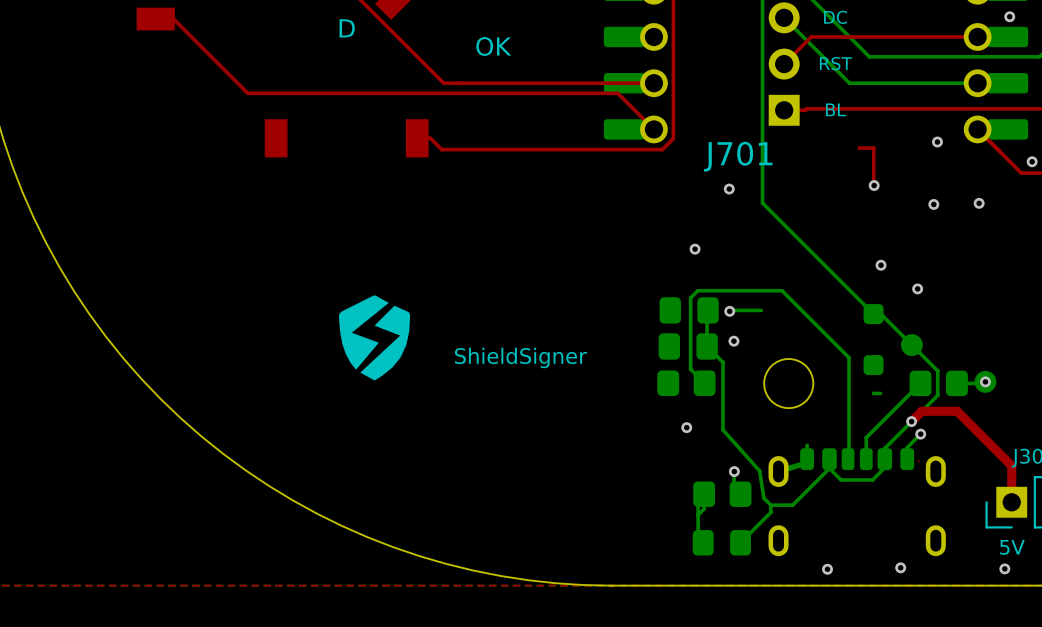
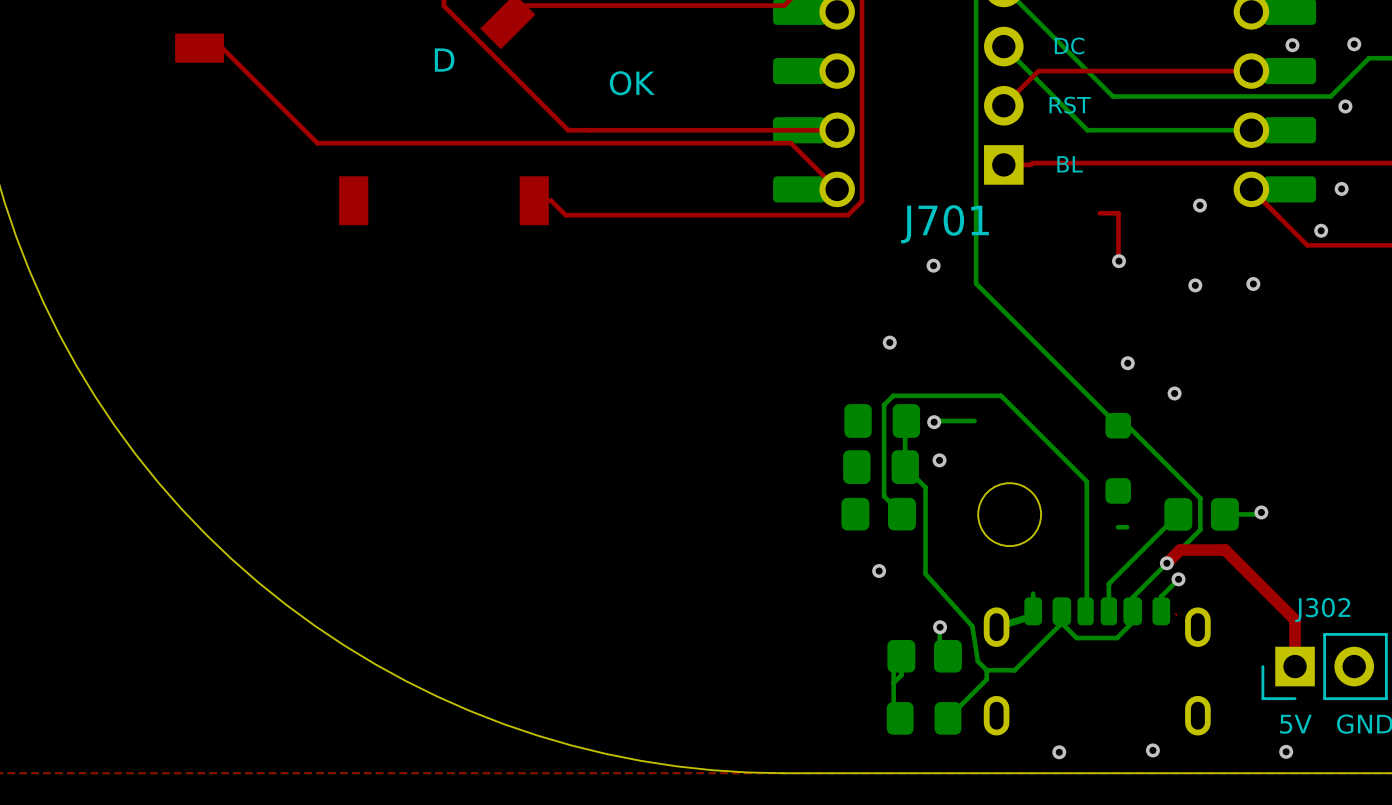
drawing: [339, 295, 411, 381] -> none
part: (911, 345) -> none
text: ShieldSigner (520, 357) -> none
part: (985, 381) -> none

